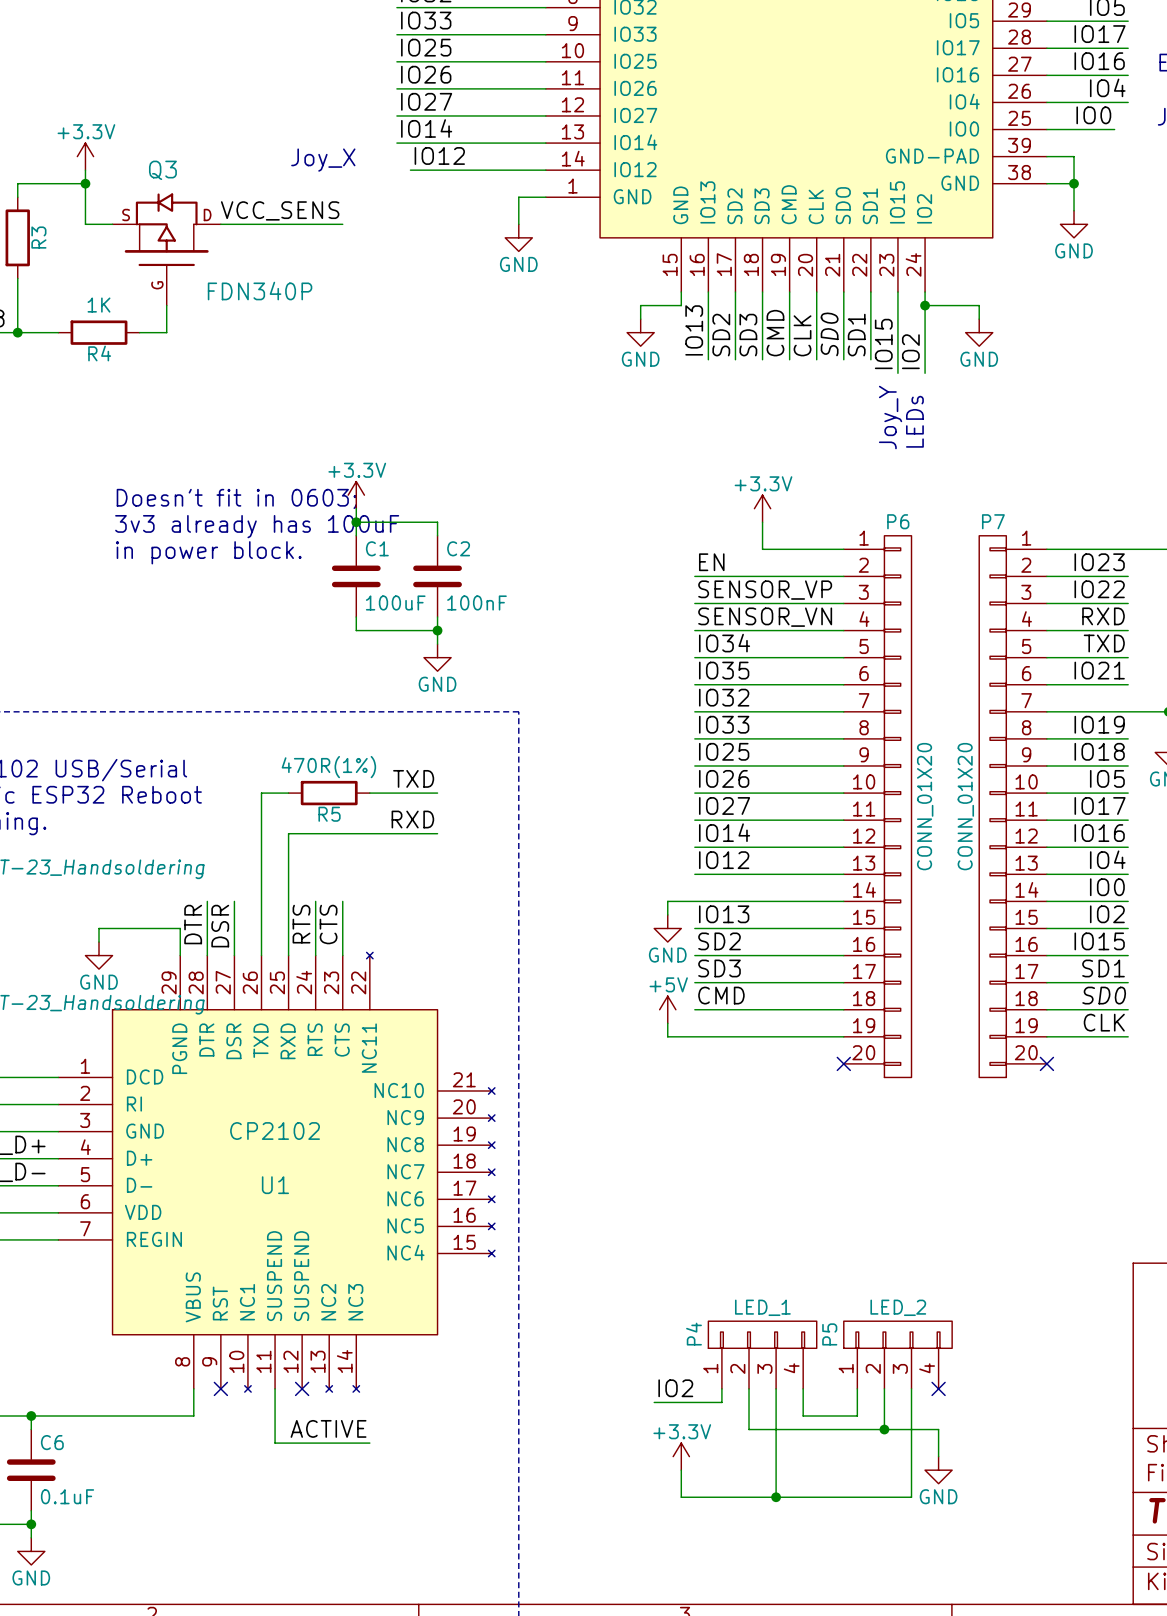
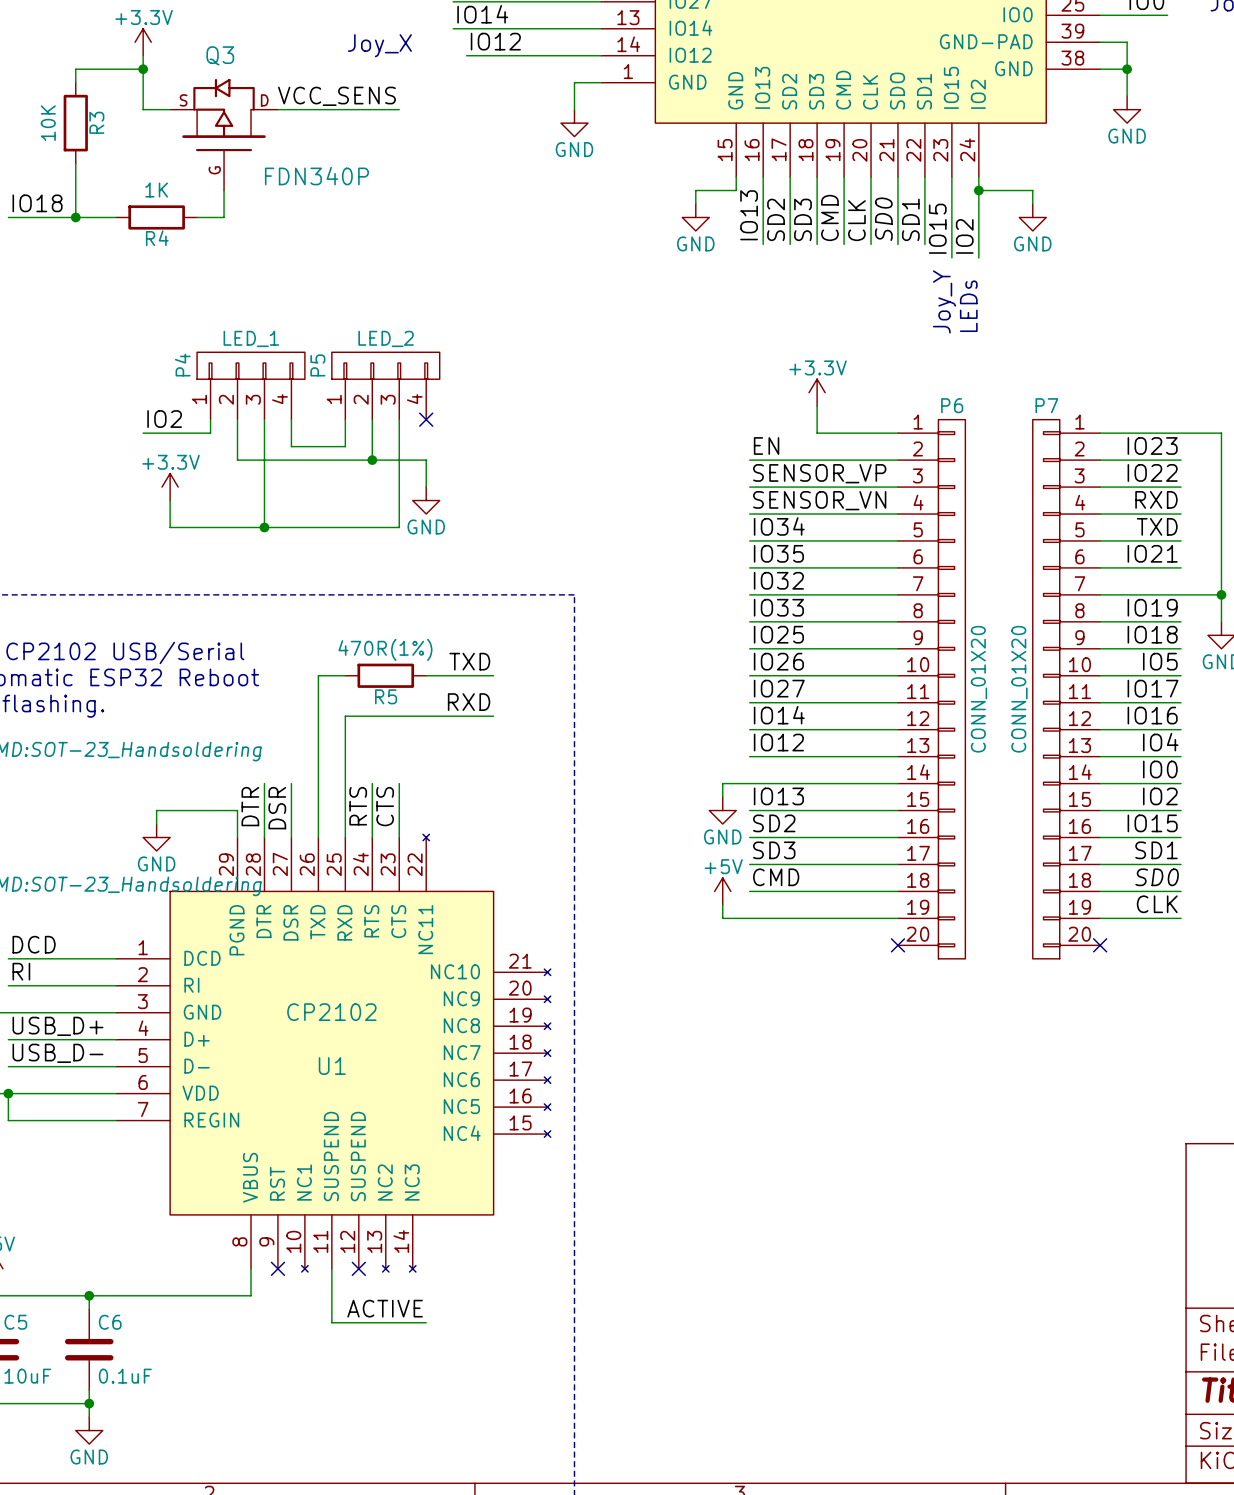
power symbol: +3.3V (356, 495) -> none
text: Doesn't fit in 0603; (236, 498) -> none
wire: (356, 508) (356, 535) -> none
wire: (356, 522) (437, 522) (437, 535) -> none
junction: (356, 522) -> none
text: 3v3 already has 100uF (257, 526) -> none
label: none -> IO2 (164, 419)
wire: none -> (210, 419) (210, 433) (143, 433)
wire: none -> (237, 419) (237, 460) (426, 460) (426, 487)
wire: none -> (264, 419) (264, 527)
wire: none -> (291, 419) (291, 446) (345, 446) (345, 419)
wire: none -> (372, 419) (372, 460)
wire: none -> (399, 419) (399, 527) (170, 527) (170, 500)
no-connect mark: none -> (426, 419)
text: in power block. (208, 552) -> none
junction: none -> (372, 460)
C1: 100uF (356, 576) -> none
C2: 100nF (437, 576) -> none
power symbol: none -> +3.3V (170, 487)
wire: (356, 617) (356, 630) (437, 630) -> none
wire: (437, 617) (437, 644) -> none
junction: (437, 630) -> none
junction: none -> (264, 527)
power symbol position: GND (437, 657) -> GND (426, 500)
P4 position: (762, 1355) -> (250, 385)
P5 position: (897, 1355) -> (385, 385)
label: IO2 (675, 1388) -> none
wire: (721, 1388) (721, 1402) (654, 1402) -> none
wire: (749, 1388) (749, 1429) (938, 1429) (938, 1456) -> none
wire: (776, 1388) (776, 1497) -> none
wire: (803, 1388) (803, 1416) (857, 1416) (857, 1388) -> none
wire: (884, 1388) (884, 1429) -> none
wire: (911, 1388) (911, 1497) (681, 1497) (681, 1470) -> none
no-connect mark: (938, 1388) -> none
junction: (884, 1429) -> none
power symbol: +3.3V (681, 1456) -> none
power symbol: GND (938, 1470) -> none
junction: (776, 1497) -> none

